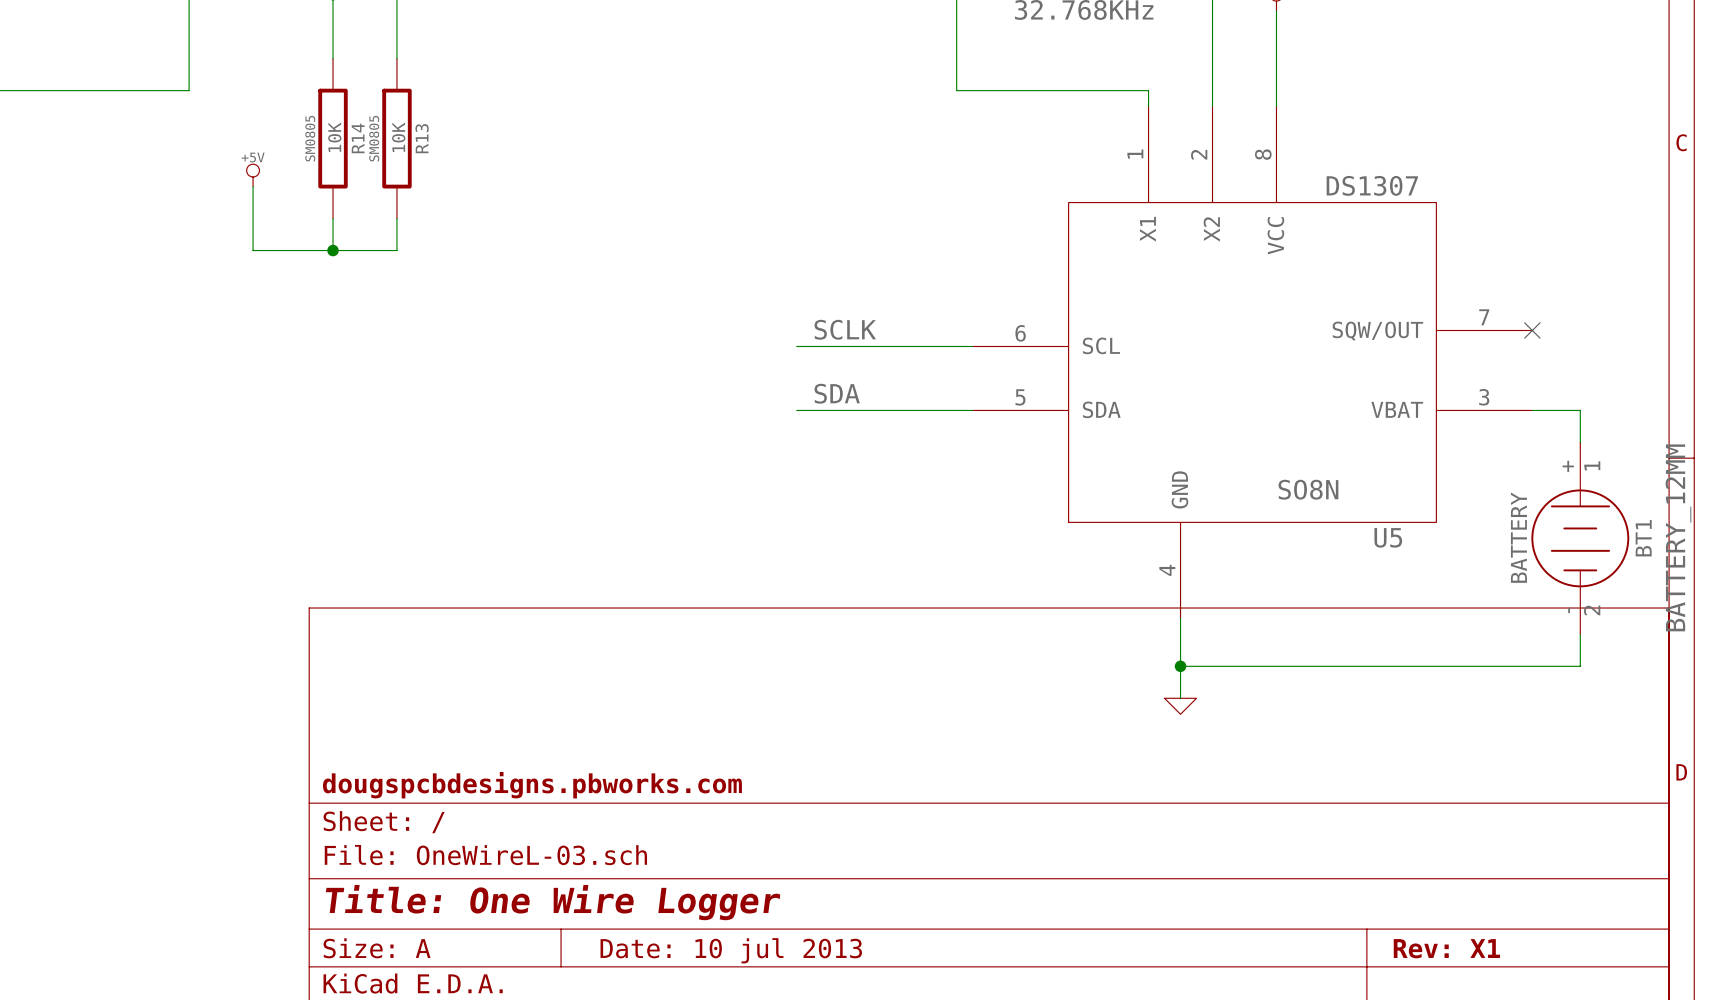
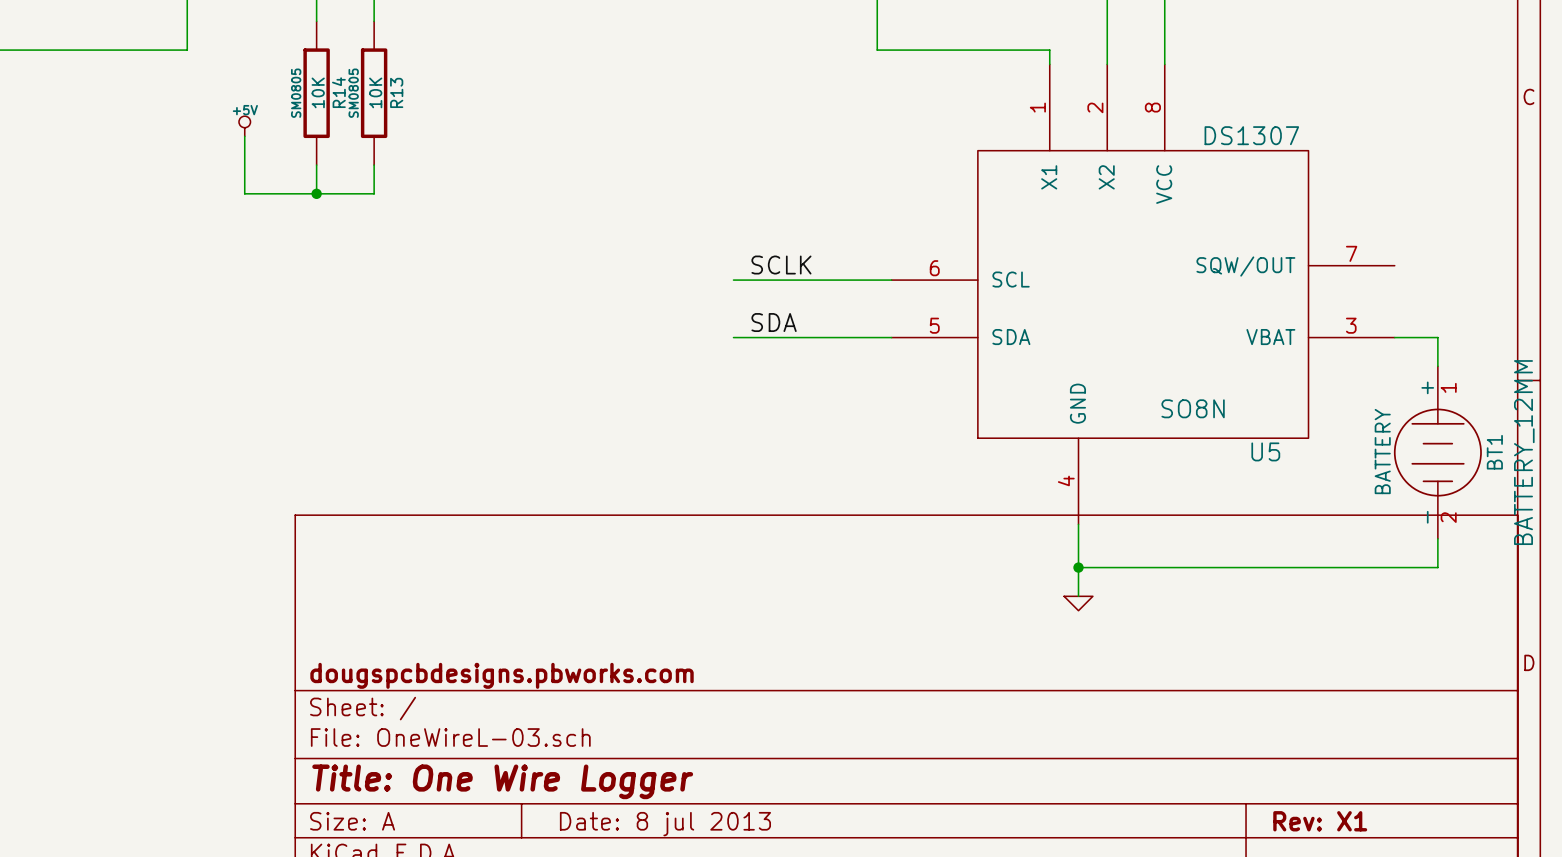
no-connect mark: (1532, 330) -> none
title block: Date: 10 jul 2013 (731, 950) -> Date: 8 jul 2013 (665, 824)

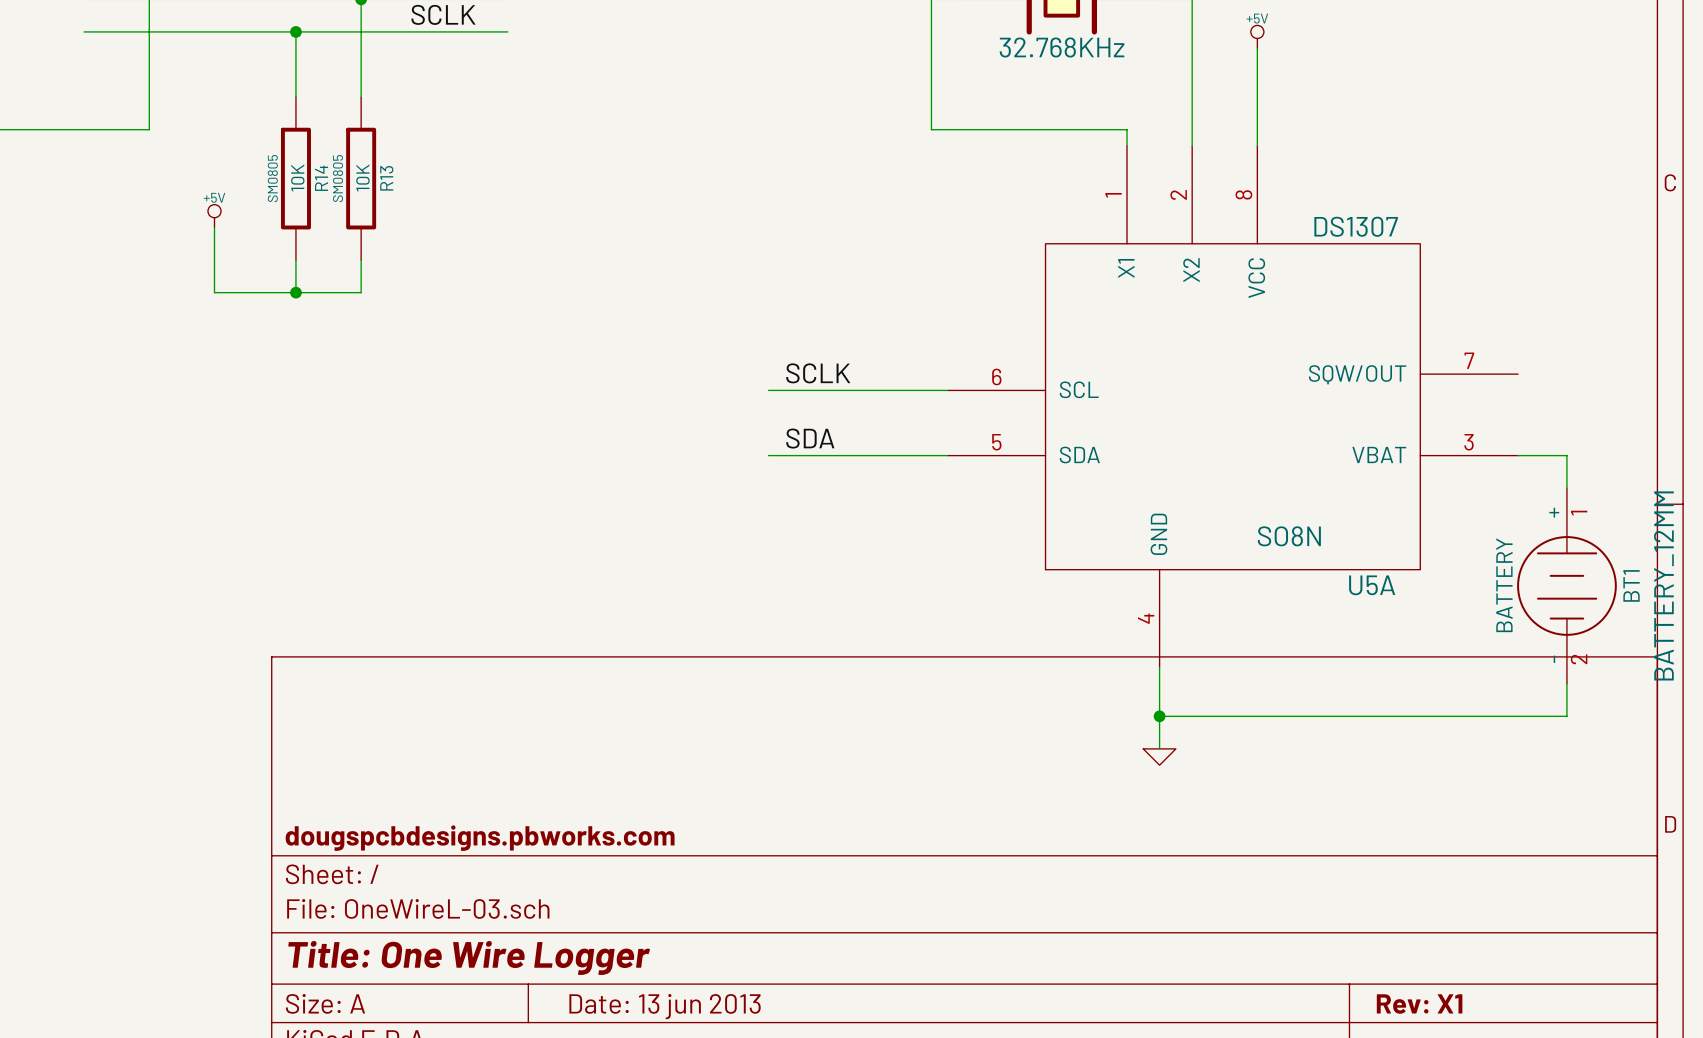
U5 name: U5 (1265, 451) -> U5A (1372, 585)
title block: Date: 8 jul 2013 (665, 824) -> Date: 13 jun 2013 (665, 1006)

